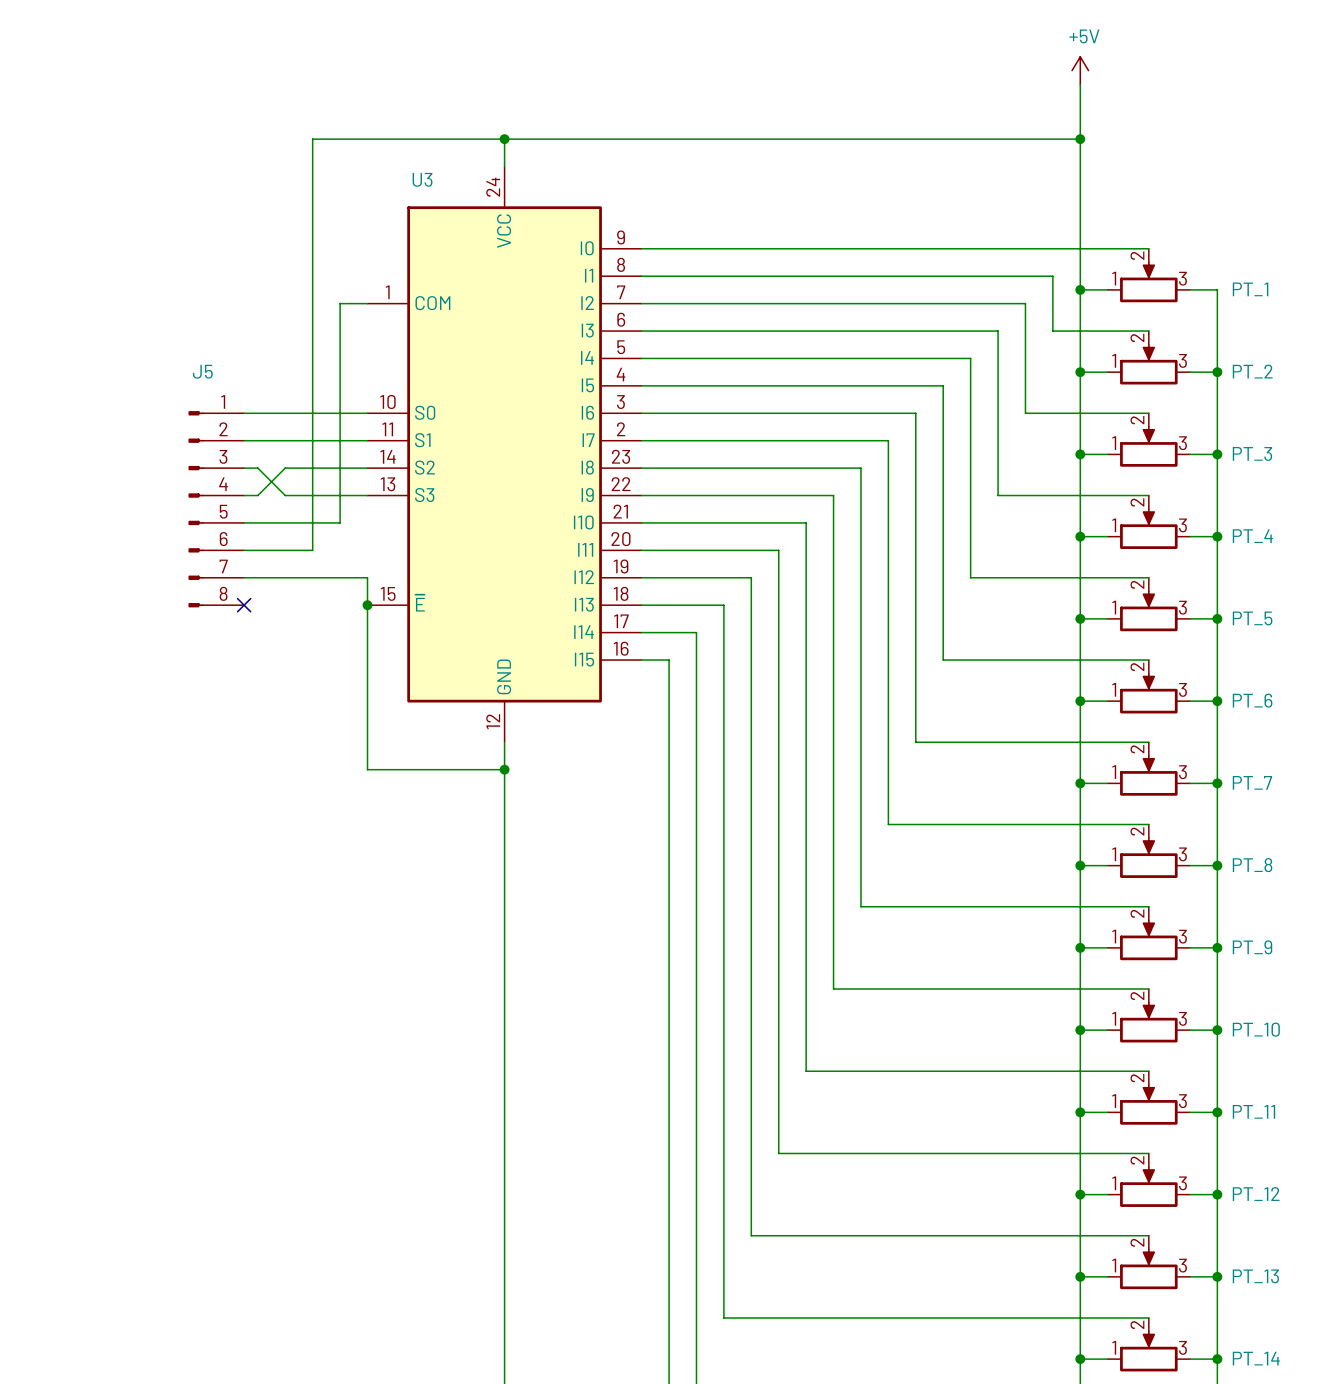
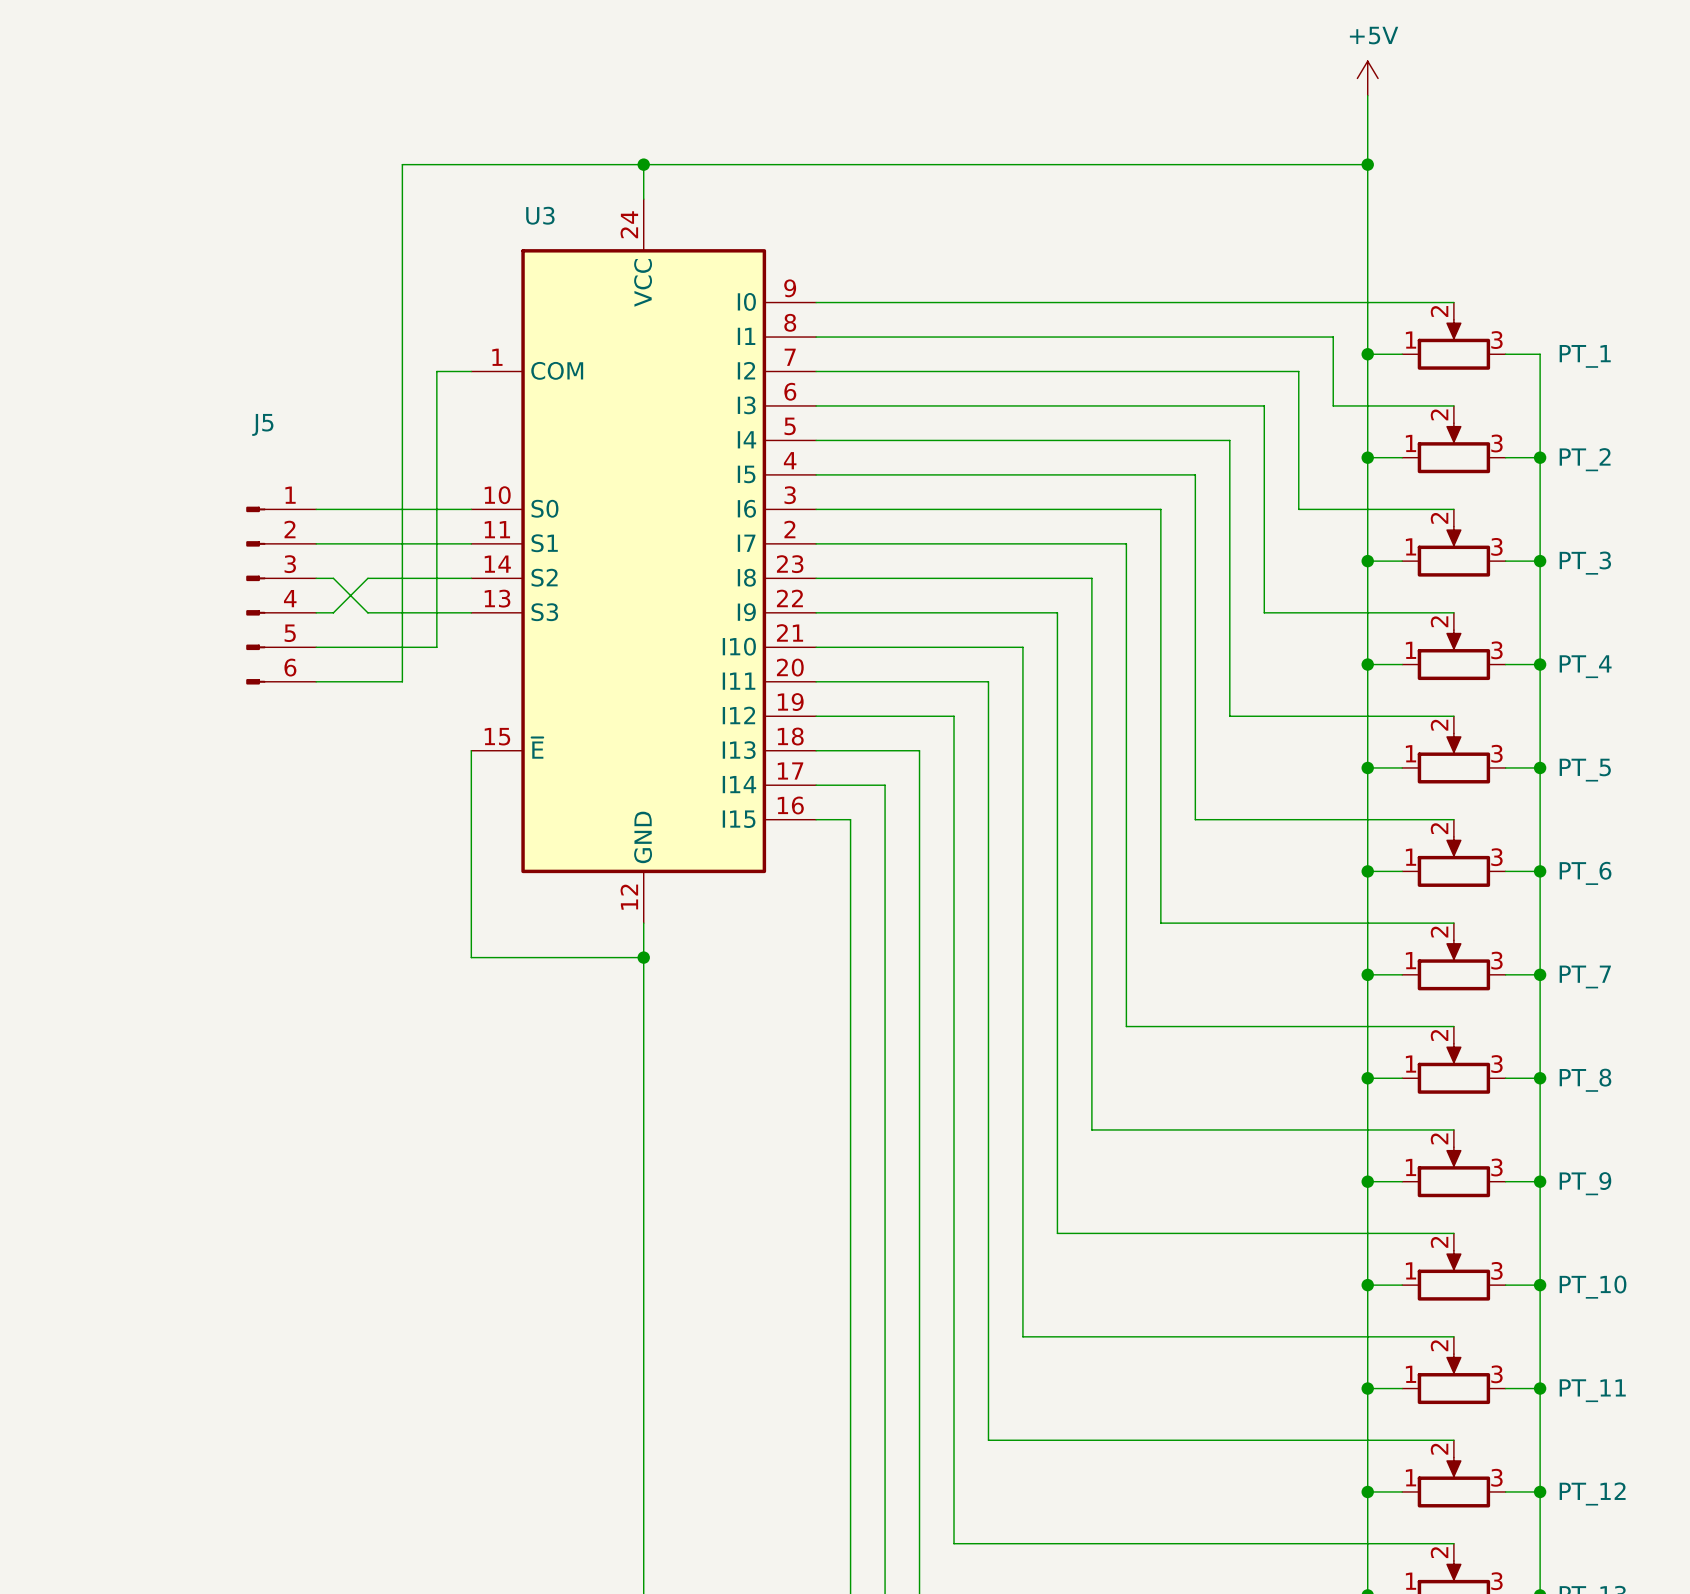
J5 symbol: [188, 411, 245, 608] -> [246, 506, 317, 685]
wire: (244, 577) (367, 577) (367, 605) -> none
no-connect mark: (244, 605) -> none
junction: (367, 605) -> none

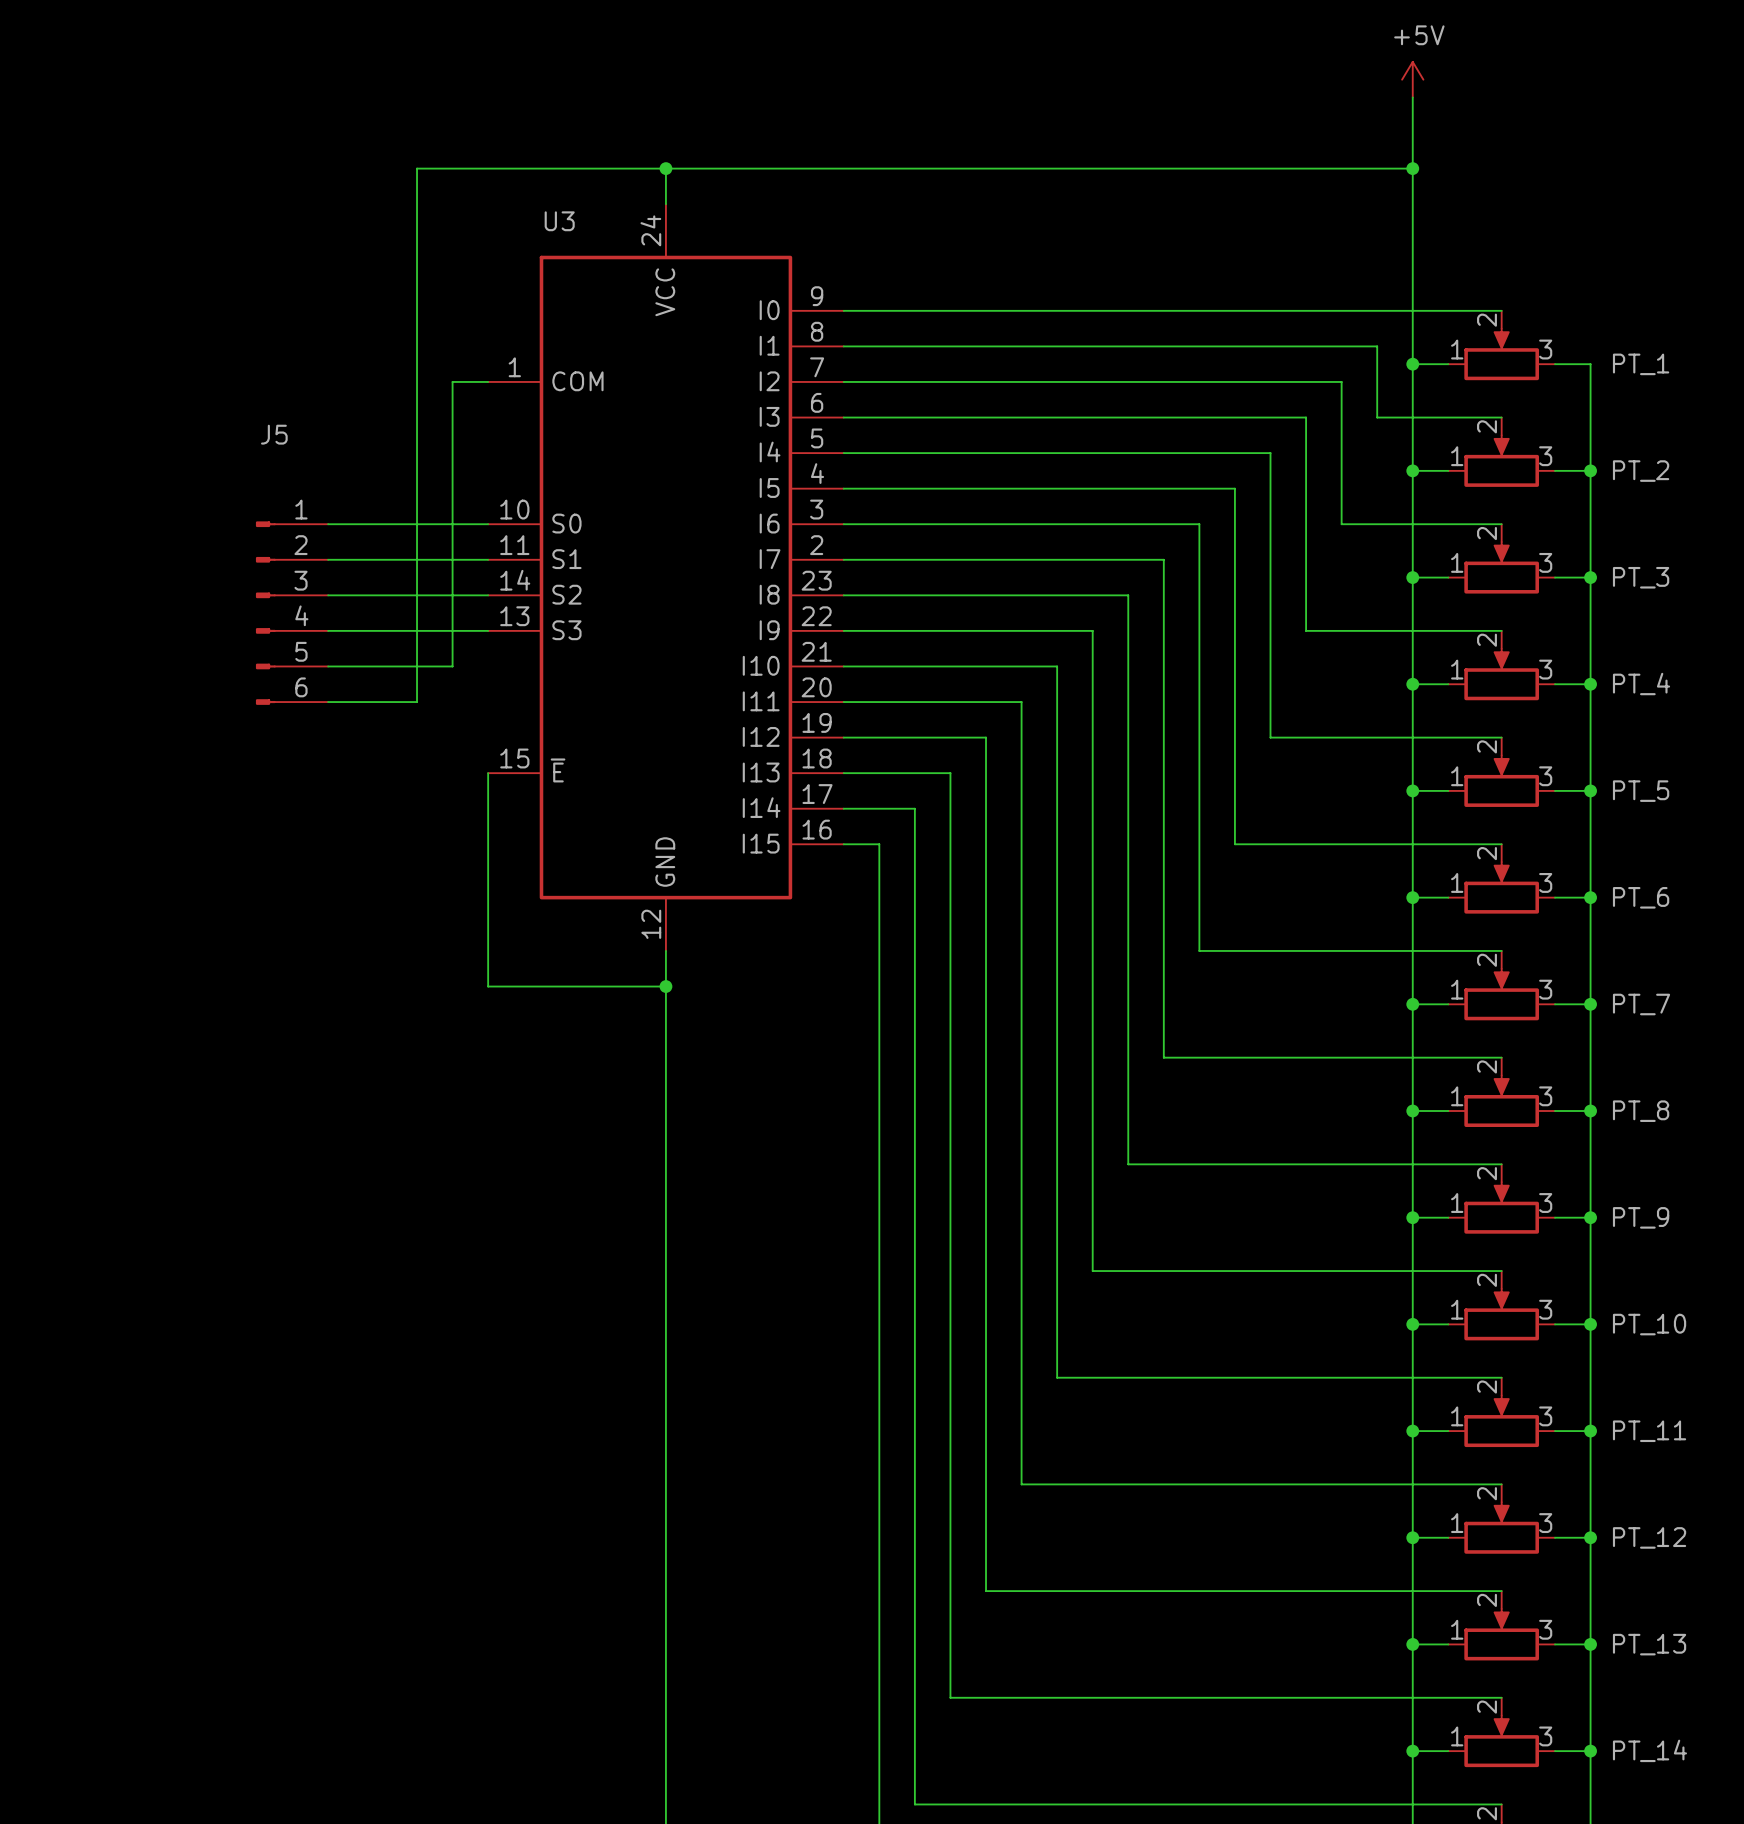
wire: (333, 578) (367, 612) -> (345, 595) (381, 595)
wire: (367, 578) (333, 612) -> (381, 630) (345, 630)

